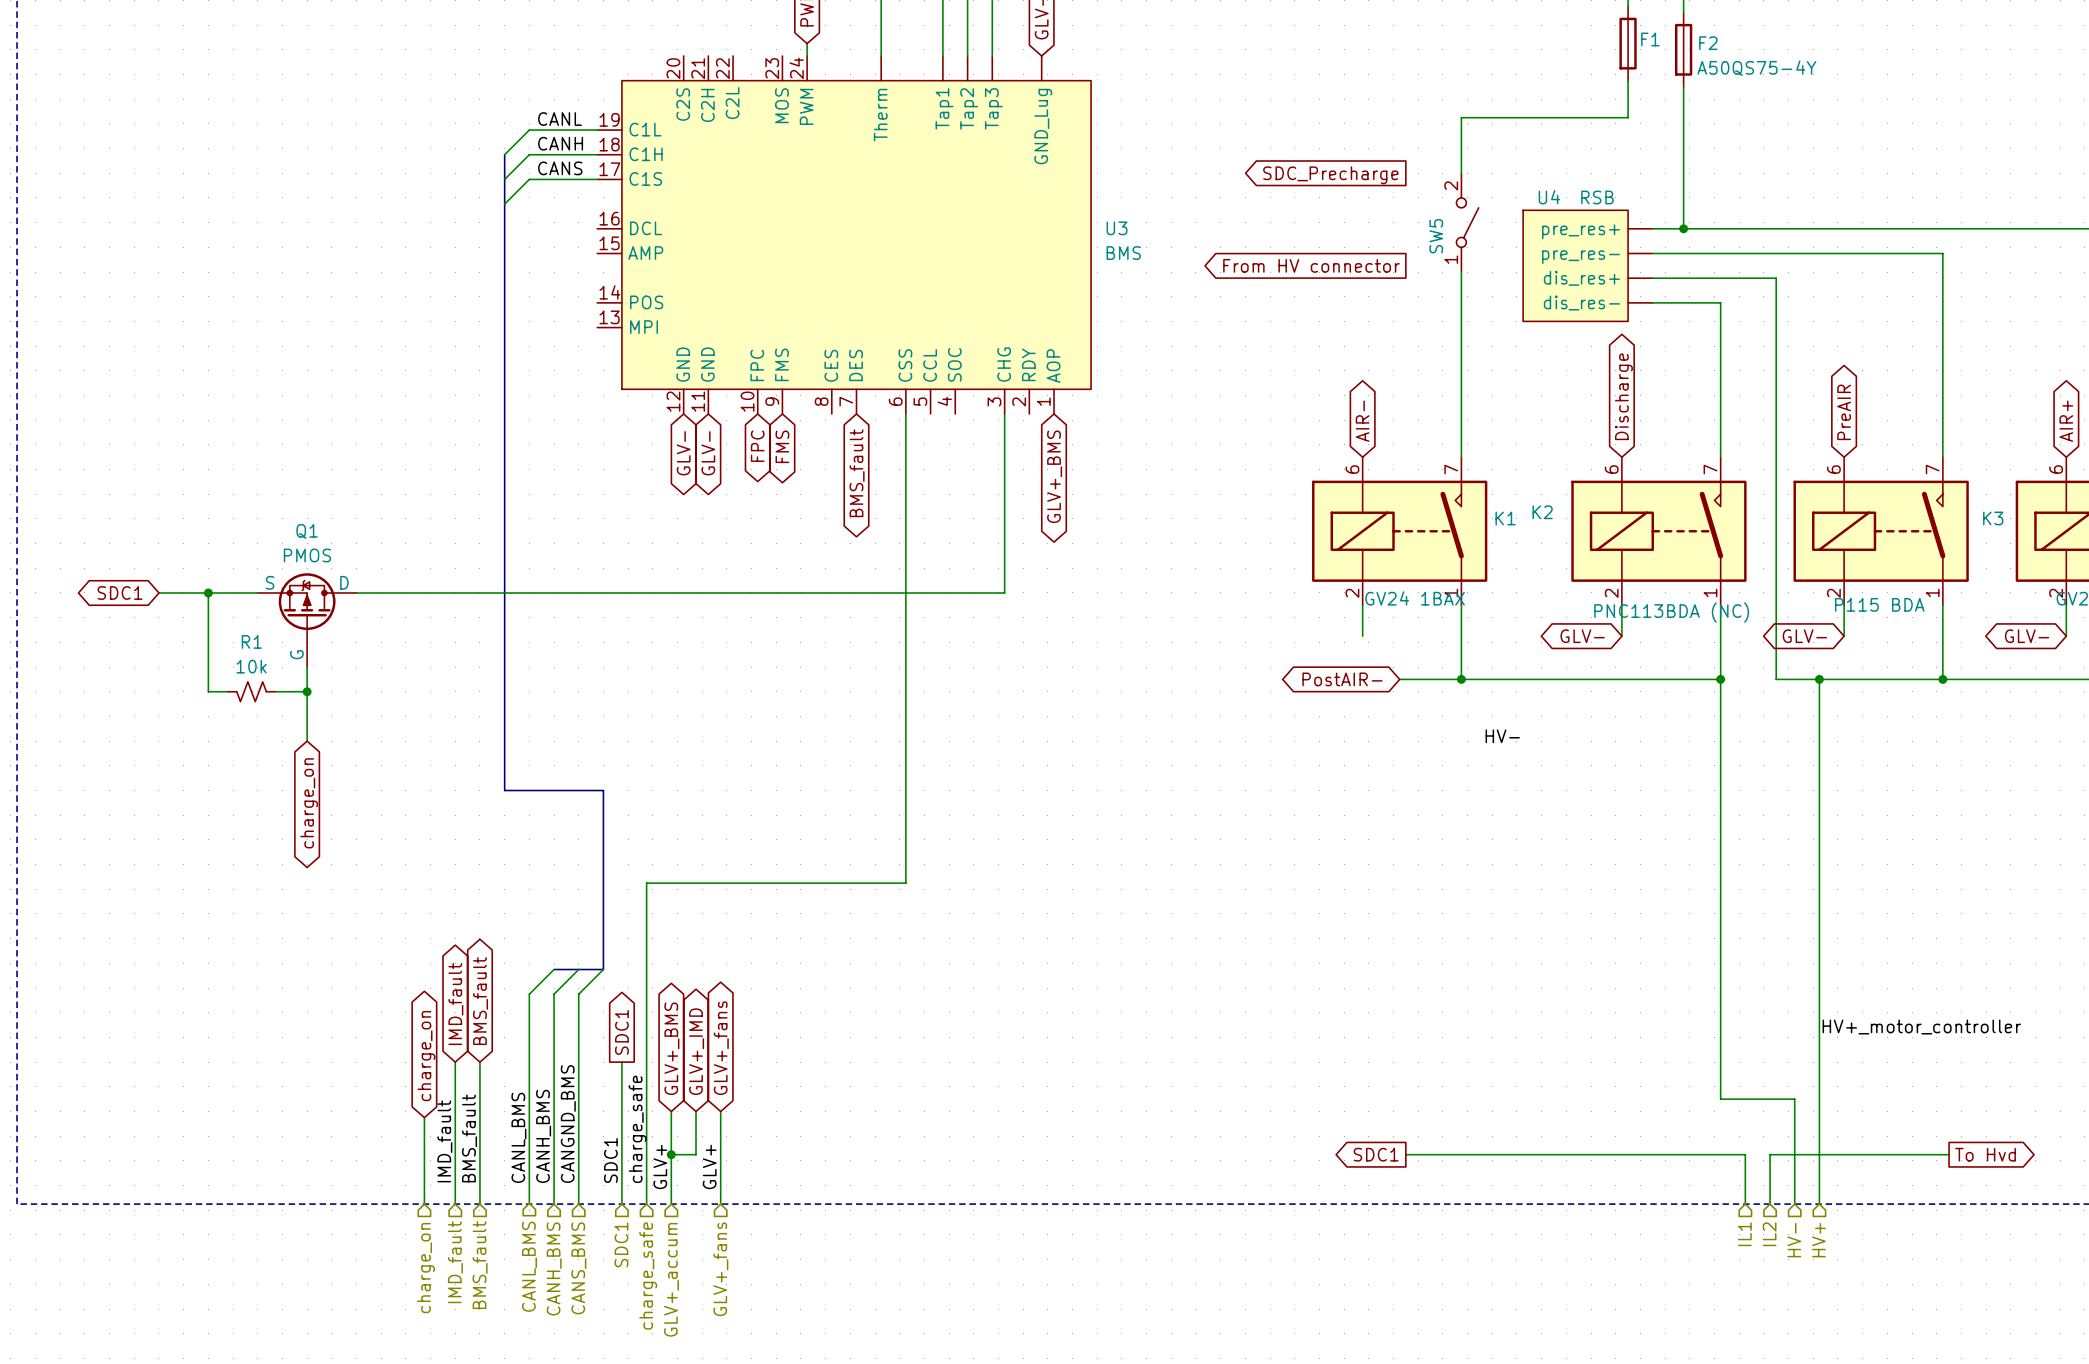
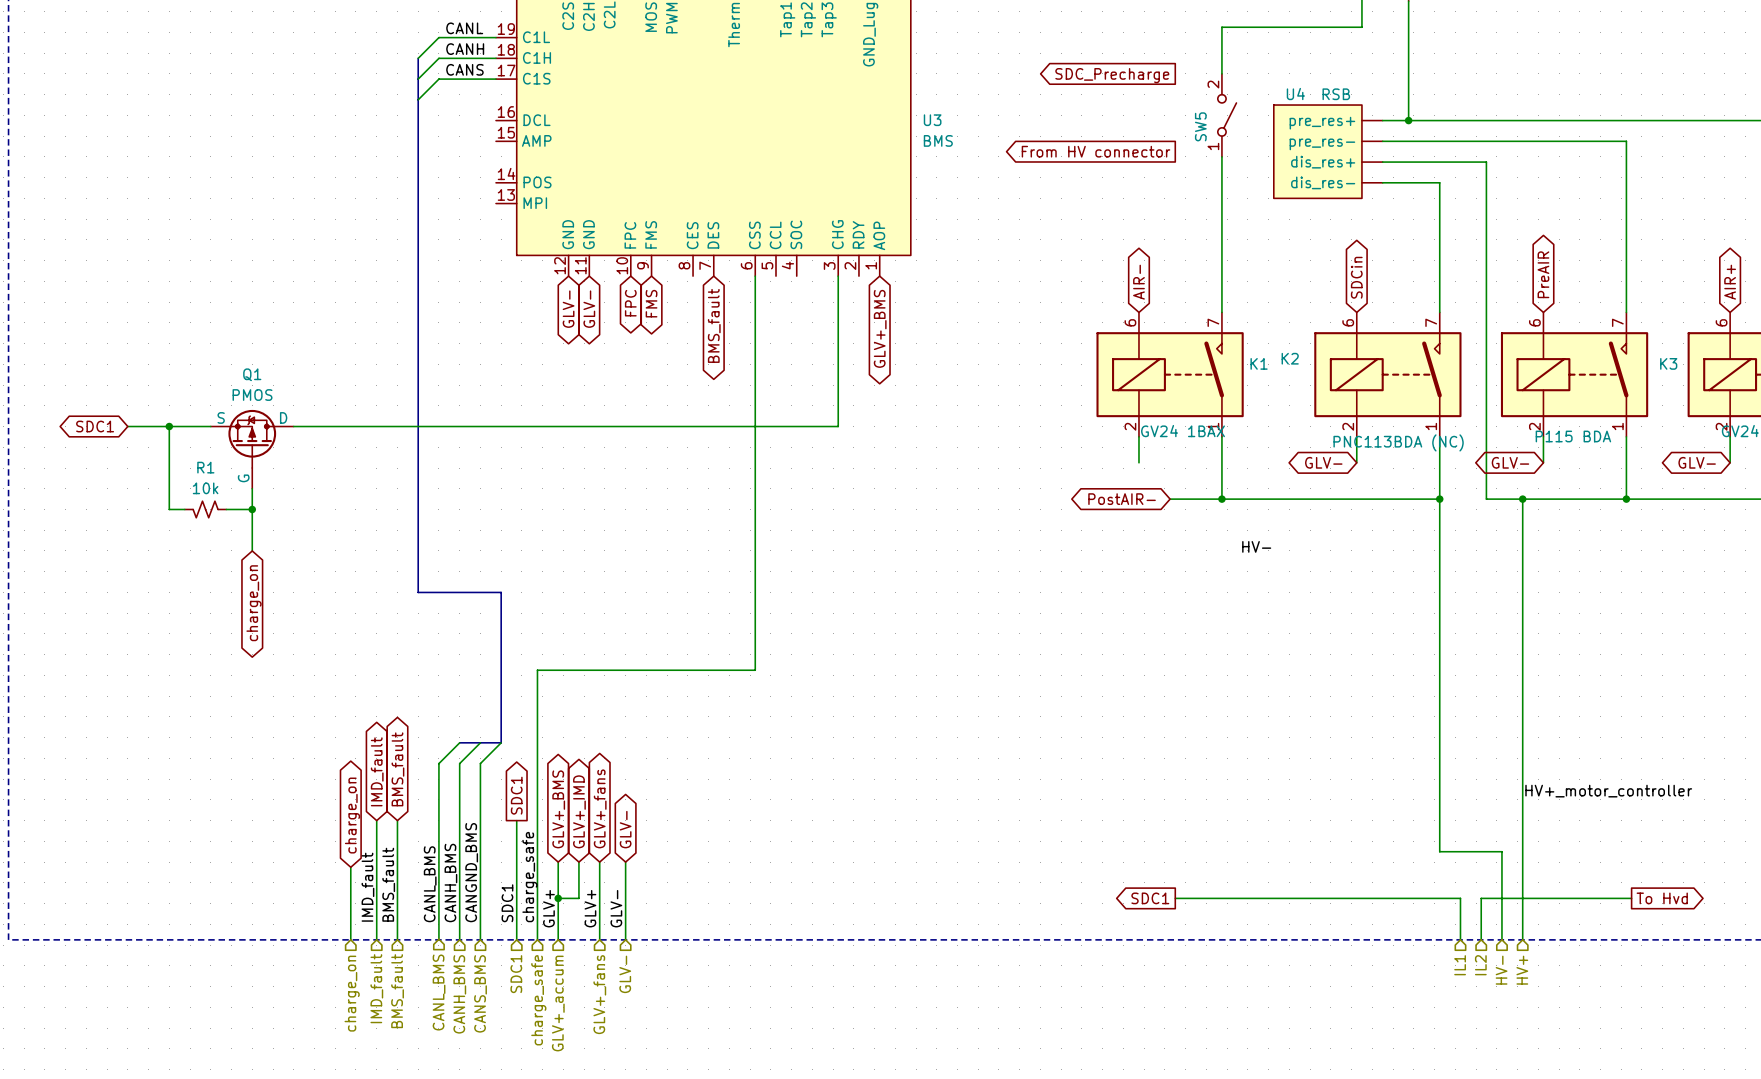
global label: Discharge (1623, 396) -> SDCin (1356, 277)
global label: none -> GLV- (625, 829)
wire: none -> (625, 862) (625, 939)
label: none -> GLV- (616, 908)
hierarchical label: none -> GLV- (625, 974)

